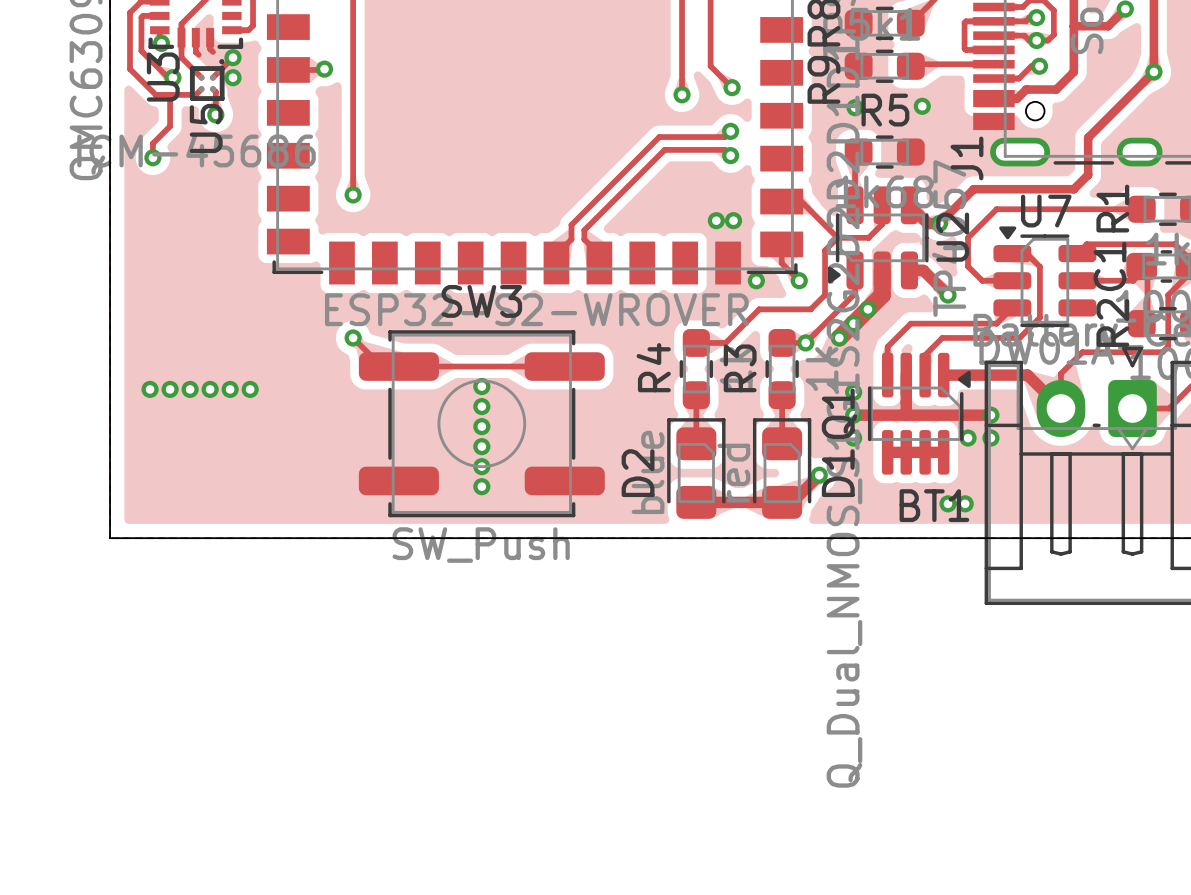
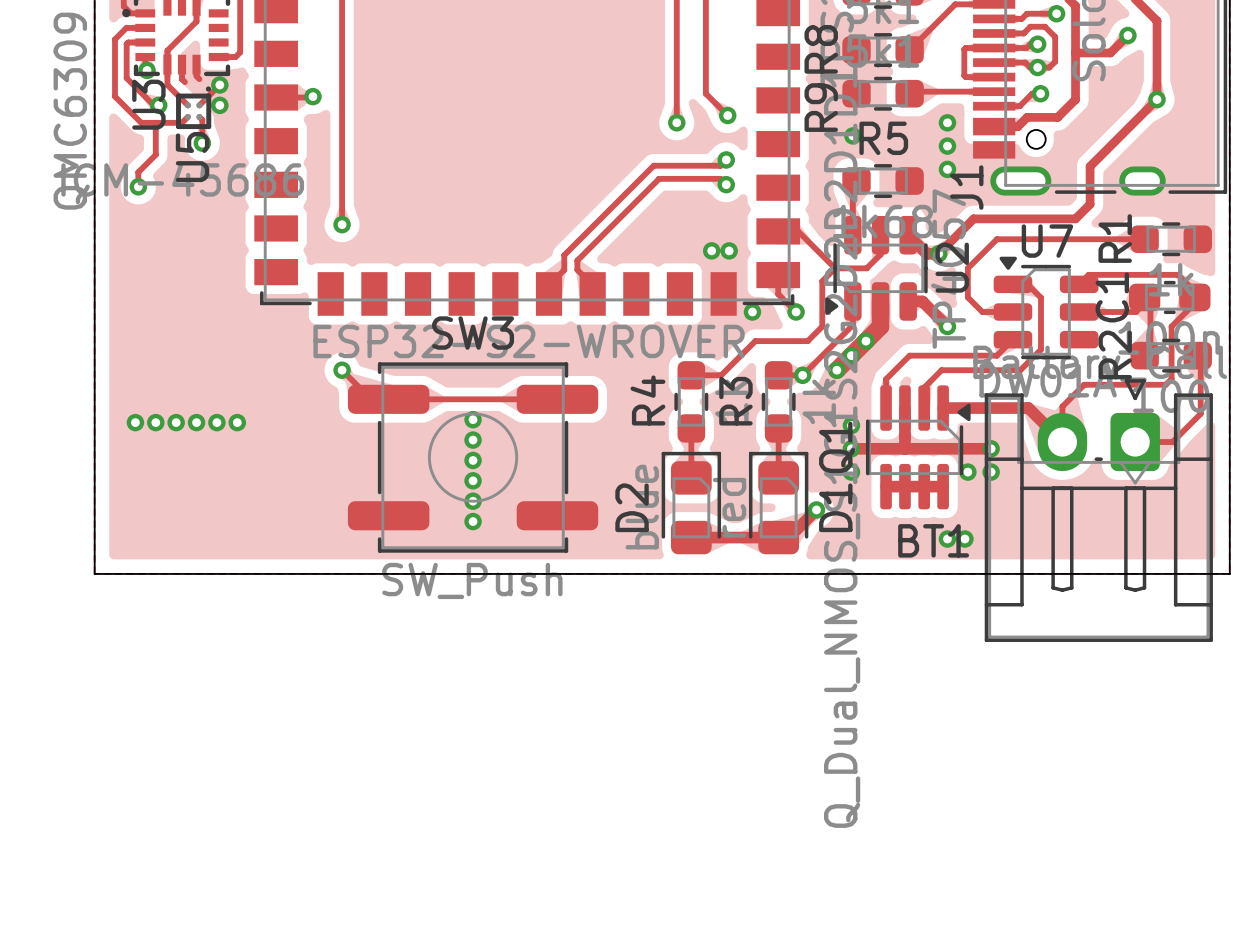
via: none -> (947, 122)
via: (922, 106) -> none
via: none -> (947, 146)
via: none -> (947, 169)

